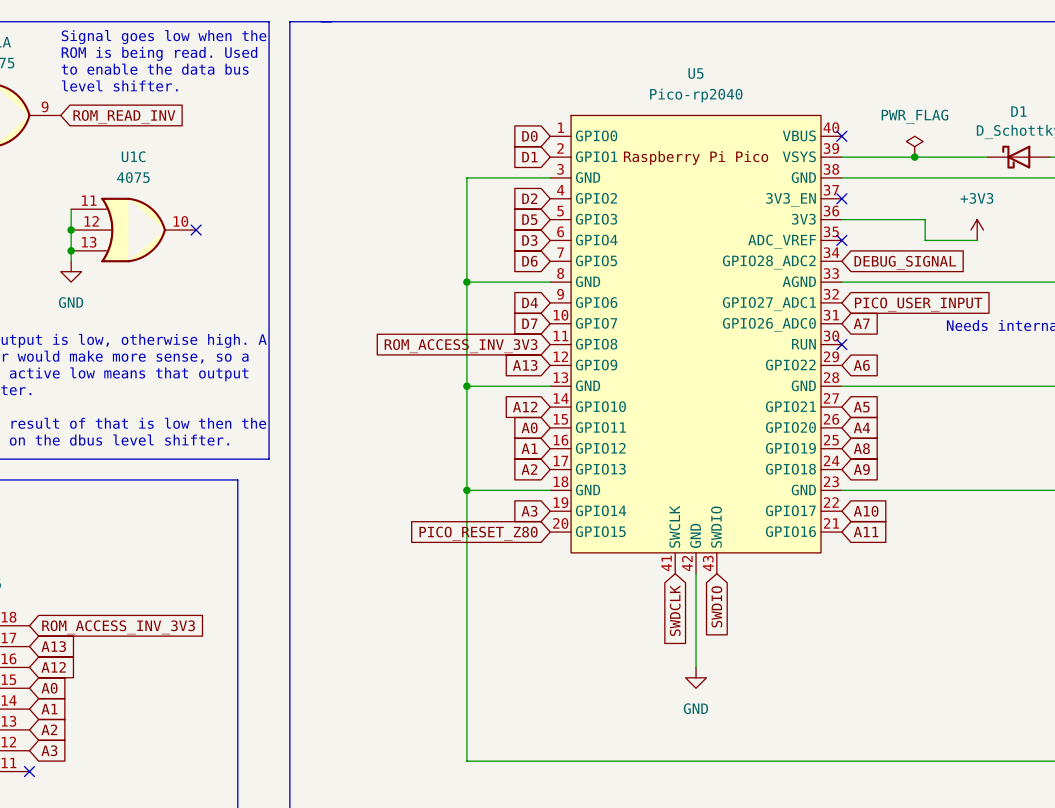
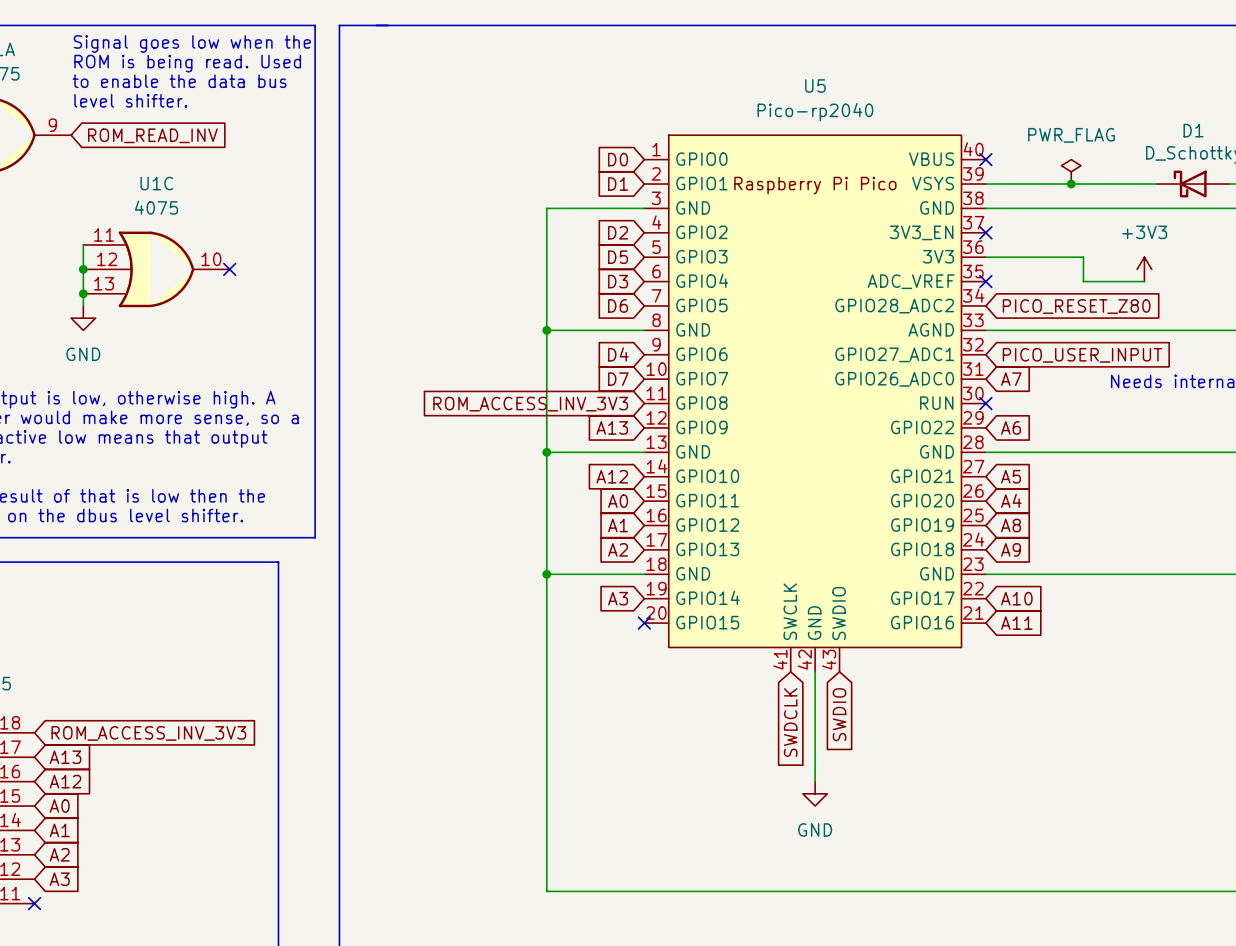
global label: DEBUG_SIGNAL (905, 262) -> PICO_RESET_Z80 (1076, 306)
no-connect mark: none -> (644, 623)
global label: PICO_RESET_Z80 (478, 533) -> none

